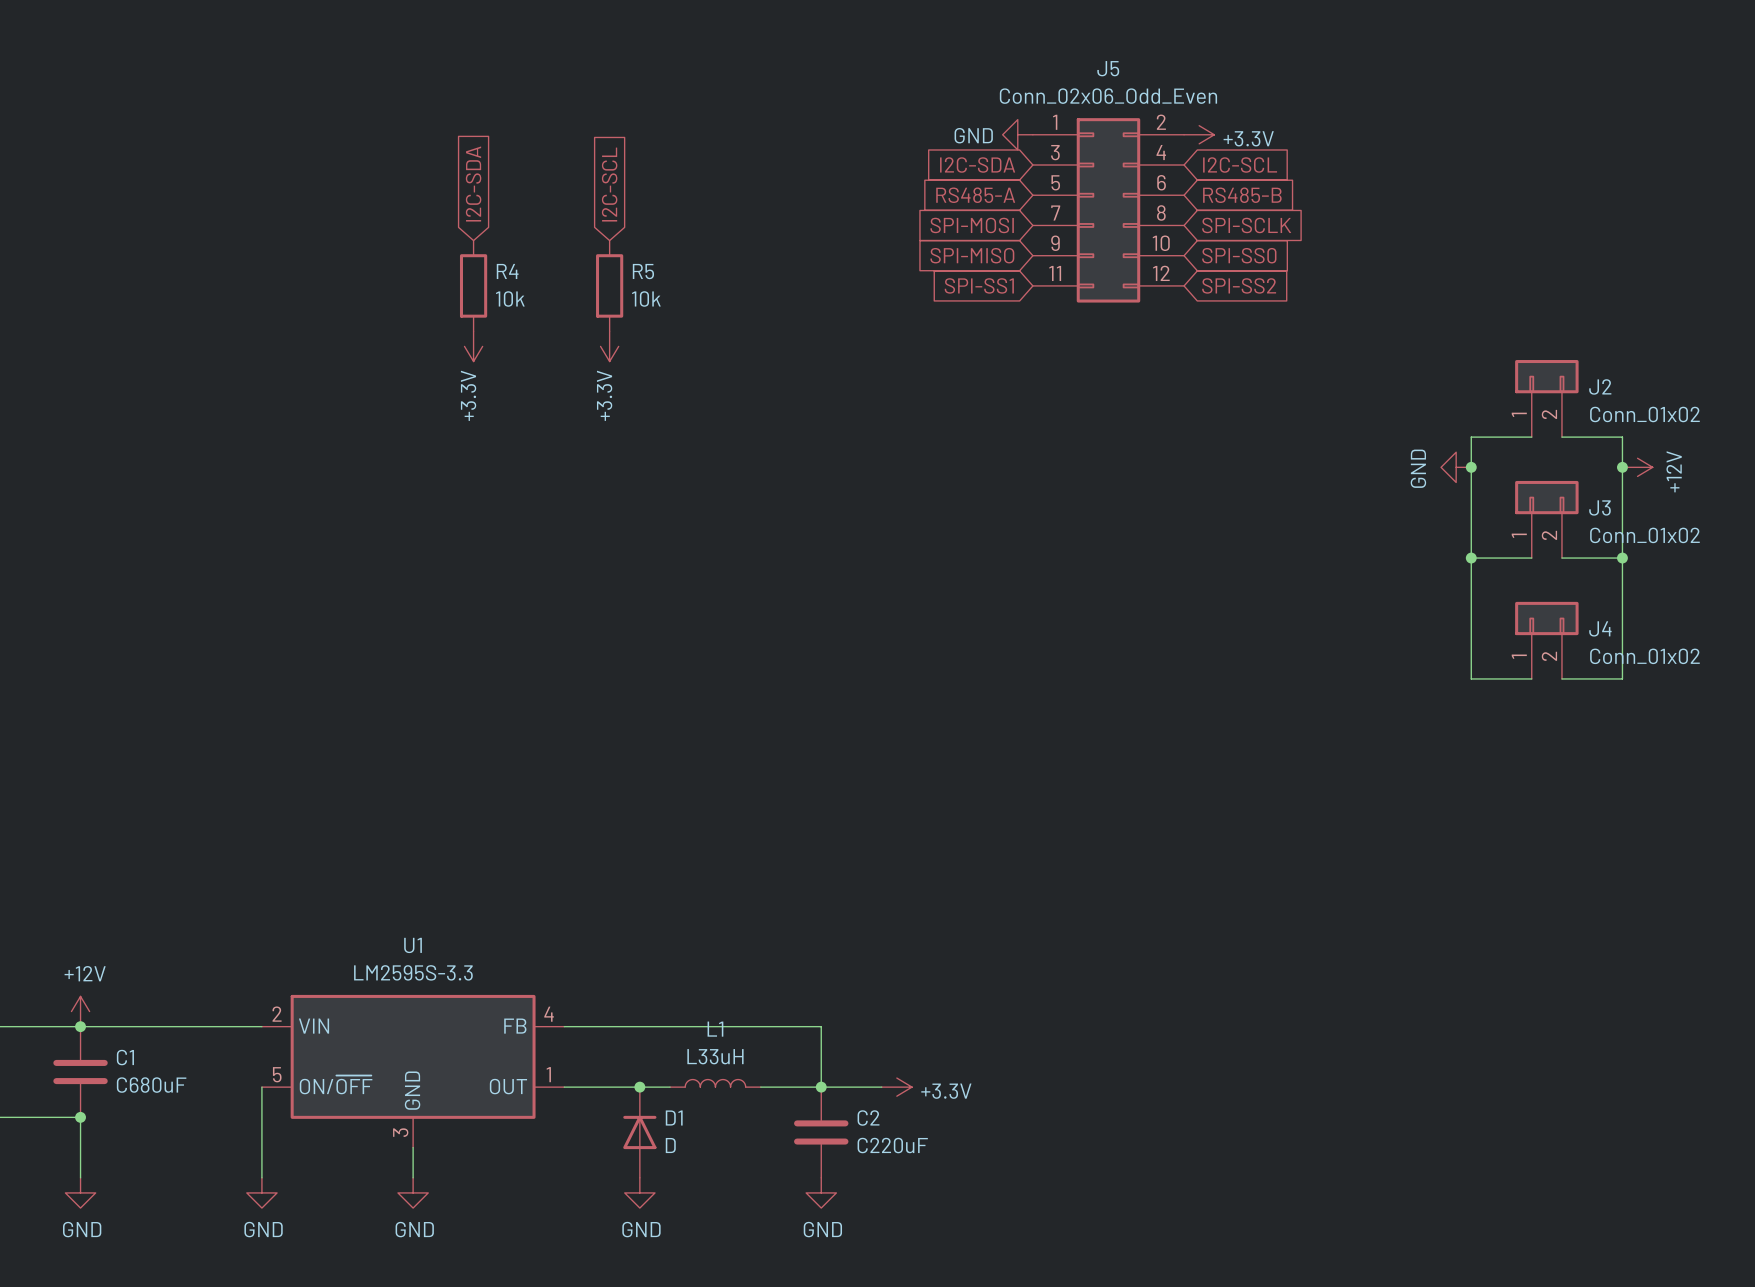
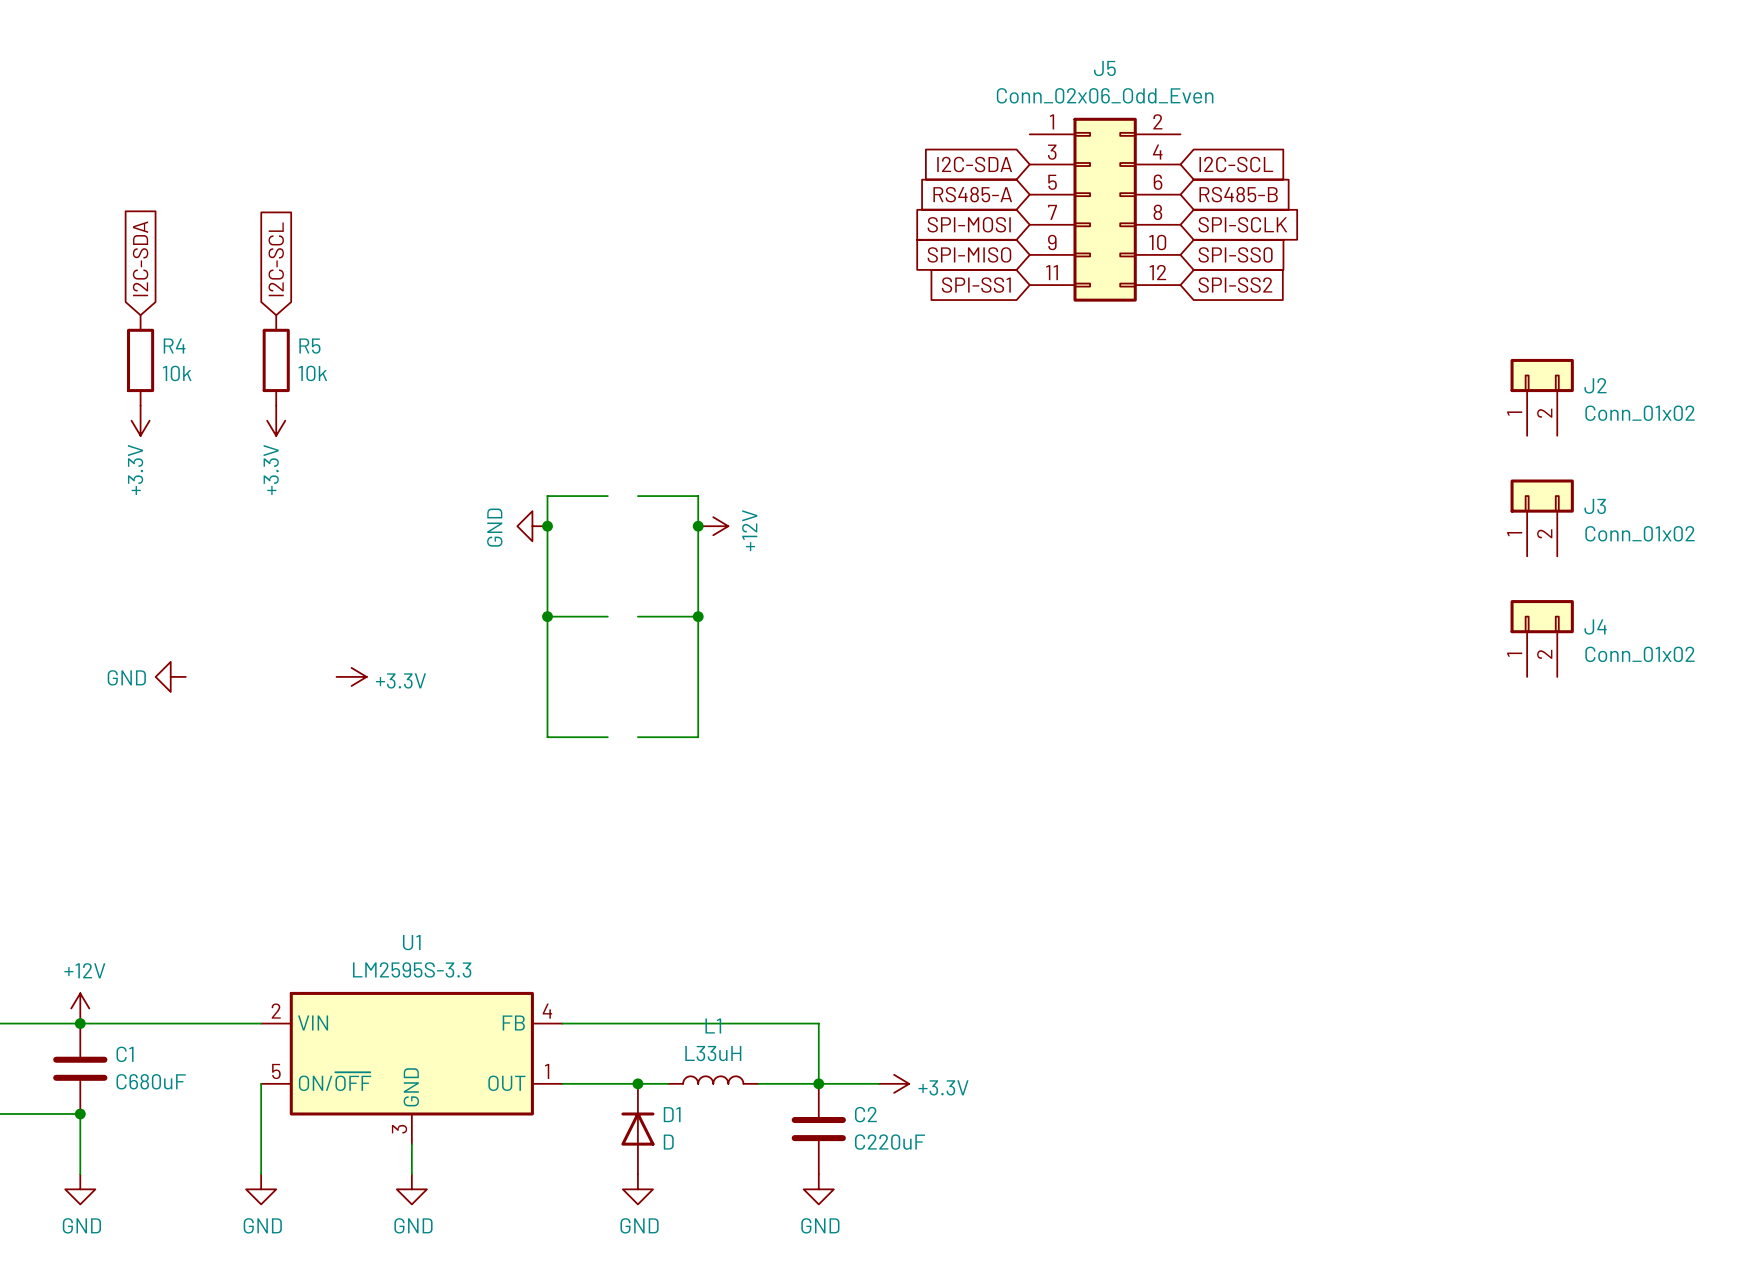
power symbol: GND (1017, 134) -> none
power symbol: +3.3V (1199, 134) -> none
global label: I2C-SDA (473, 184) -> none
global label: I2C-SCL (609, 184) -> none
global label: none -> I2C-SDA (140, 258)
global label: none -> I2C-SCL (276, 259)
R4 position: (473, 285) -> (140, 360)
R5 position: (609, 285) -> (276, 360)
power symbol: +3.3V (473, 346) -> none
power symbol: +3.3V (609, 346) -> none
power symbol: none -> +3.3V (140, 420)
power symbol: none -> +3.3V (276, 420)
wire: (1531, 437) (1471, 437) (1471, 678) (1531, 678) -> none
wire: (1561, 437) (1622, 437) (1622, 678) (1561, 678) -> none
power symbol: GND (1456, 467) -> none
junction: (1471, 467) -> none
junction: (1622, 467) -> none
power symbol: +12V (1637, 467) -> none
wire: none -> (607, 496) (547, 496) (547, 737) (607, 737)
wire: none -> (637, 496) (698, 496) (698, 737) (637, 737)
power symbol: none -> GND (532, 526)
junction: none -> (547, 526)
junction: none -> (698, 526)
power symbol: none -> +12V (713, 526)
wire: (1471, 558) (1531, 558) -> none
junction: (1471, 558) -> none
wire: (1561, 558) (1622, 558) -> none
junction: (1622, 558) -> none
wire: none -> (547, 616) (607, 616)
junction: none -> (547, 616)
wire: none -> (637, 616) (698, 616)
junction: none -> (698, 616)
power symbol: none -> GND (170, 676)
power symbol: none -> +3.3V (351, 676)

